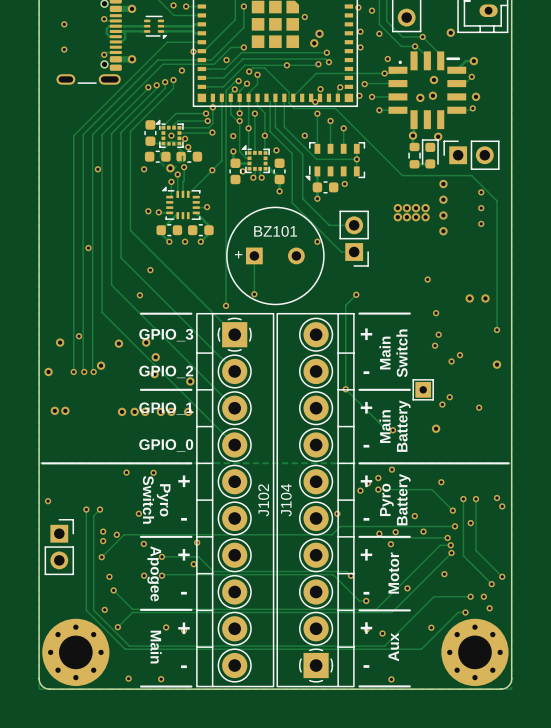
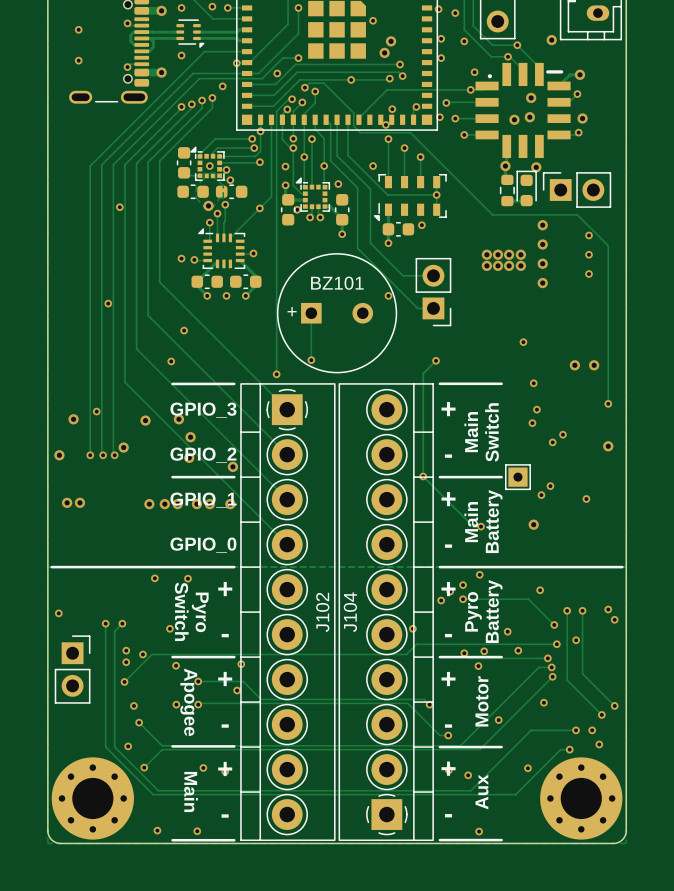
via: none -> (181, 7)
via: none -> (181, 55)
via: (144, 169) -> none

